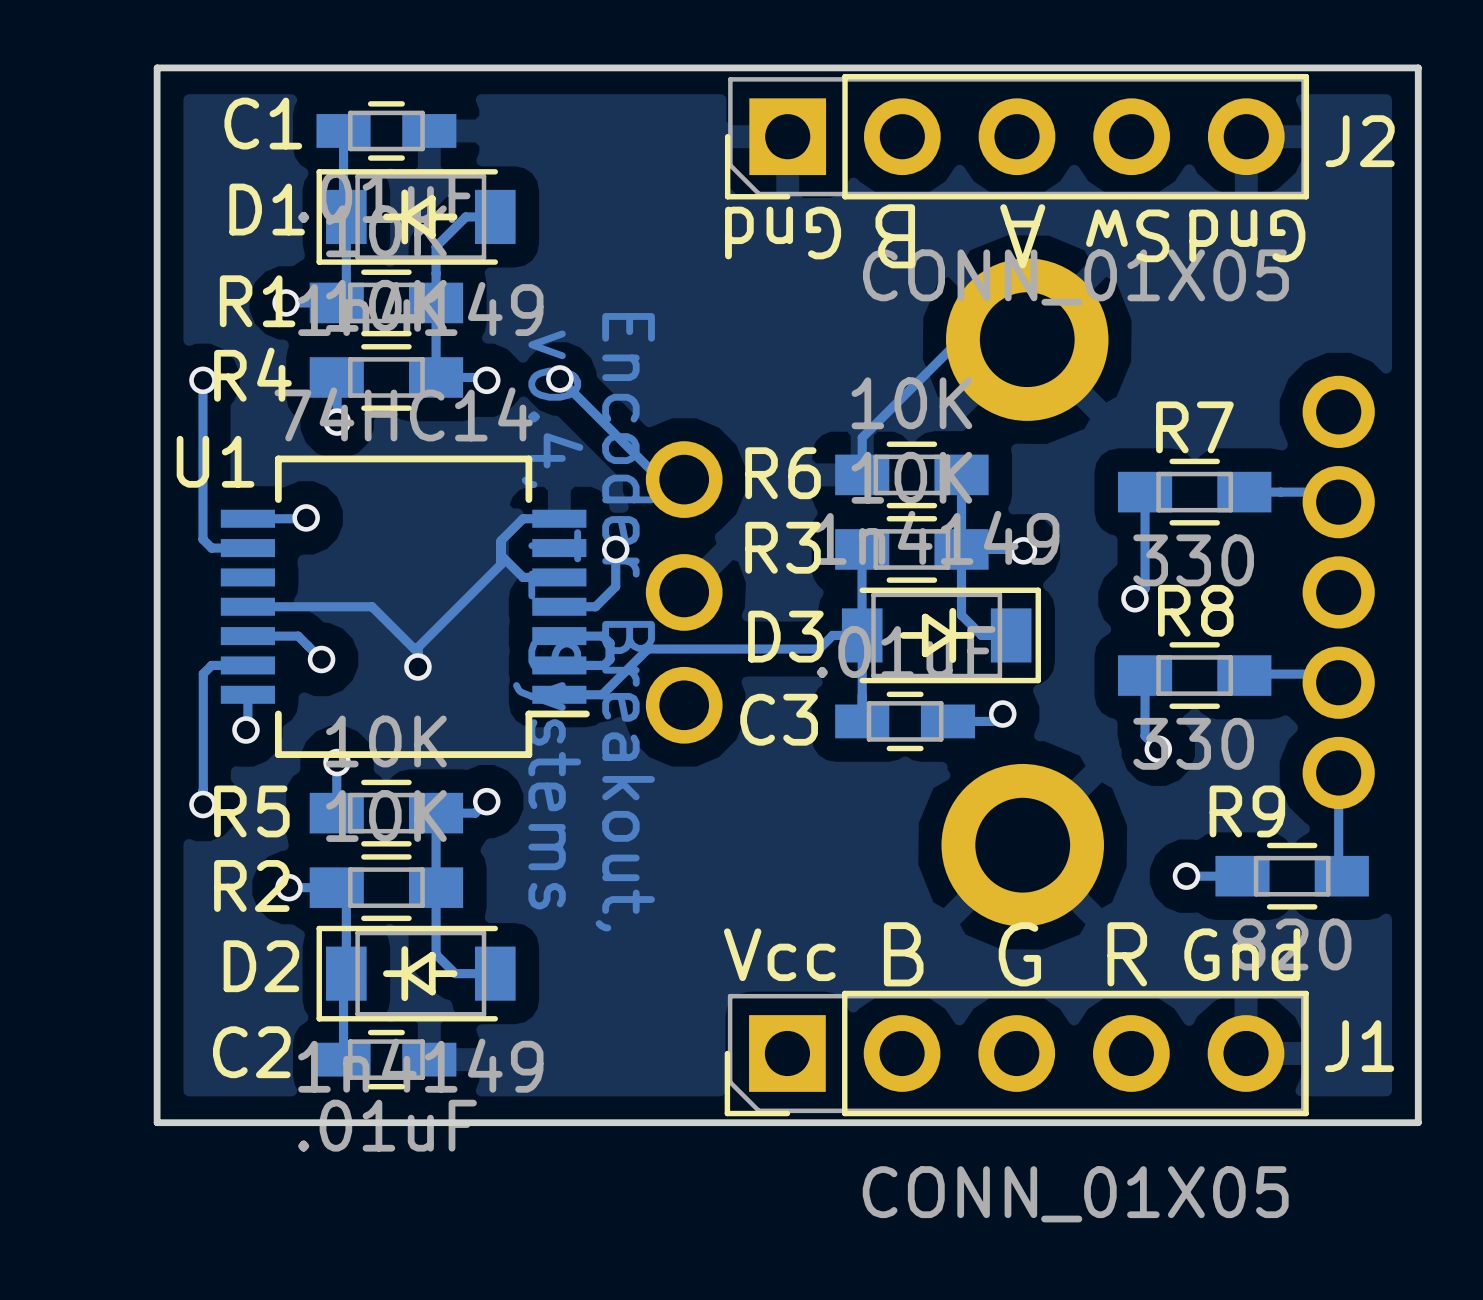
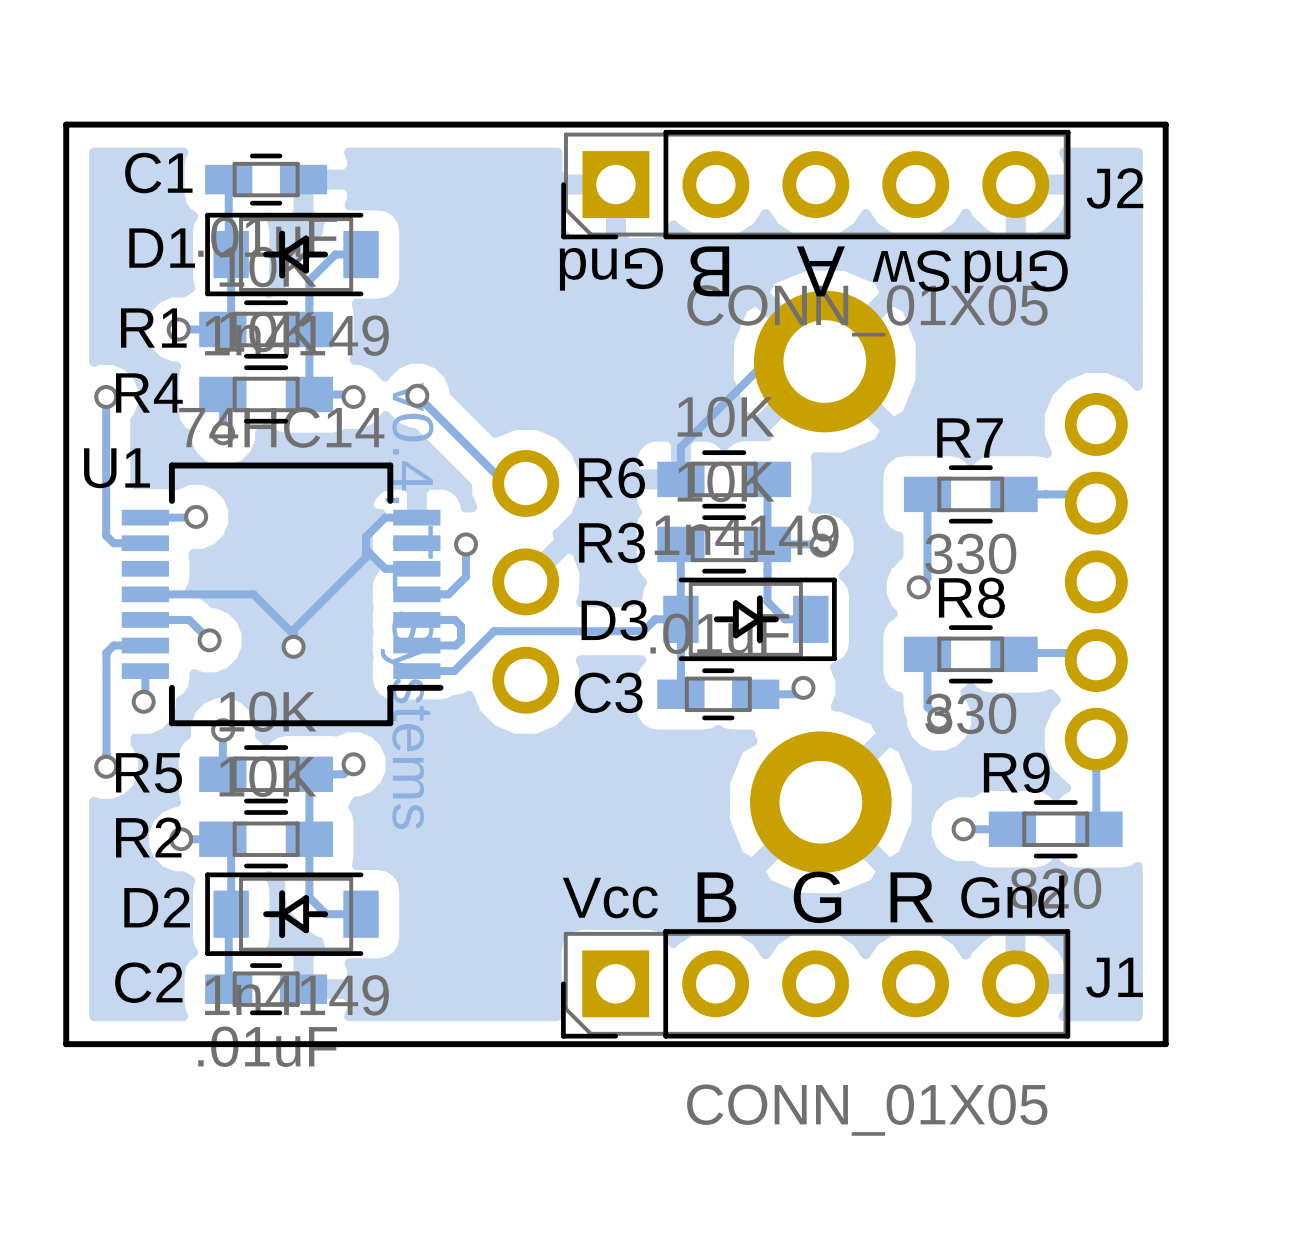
text: Encoder Breakout, (625, 622) -> none

